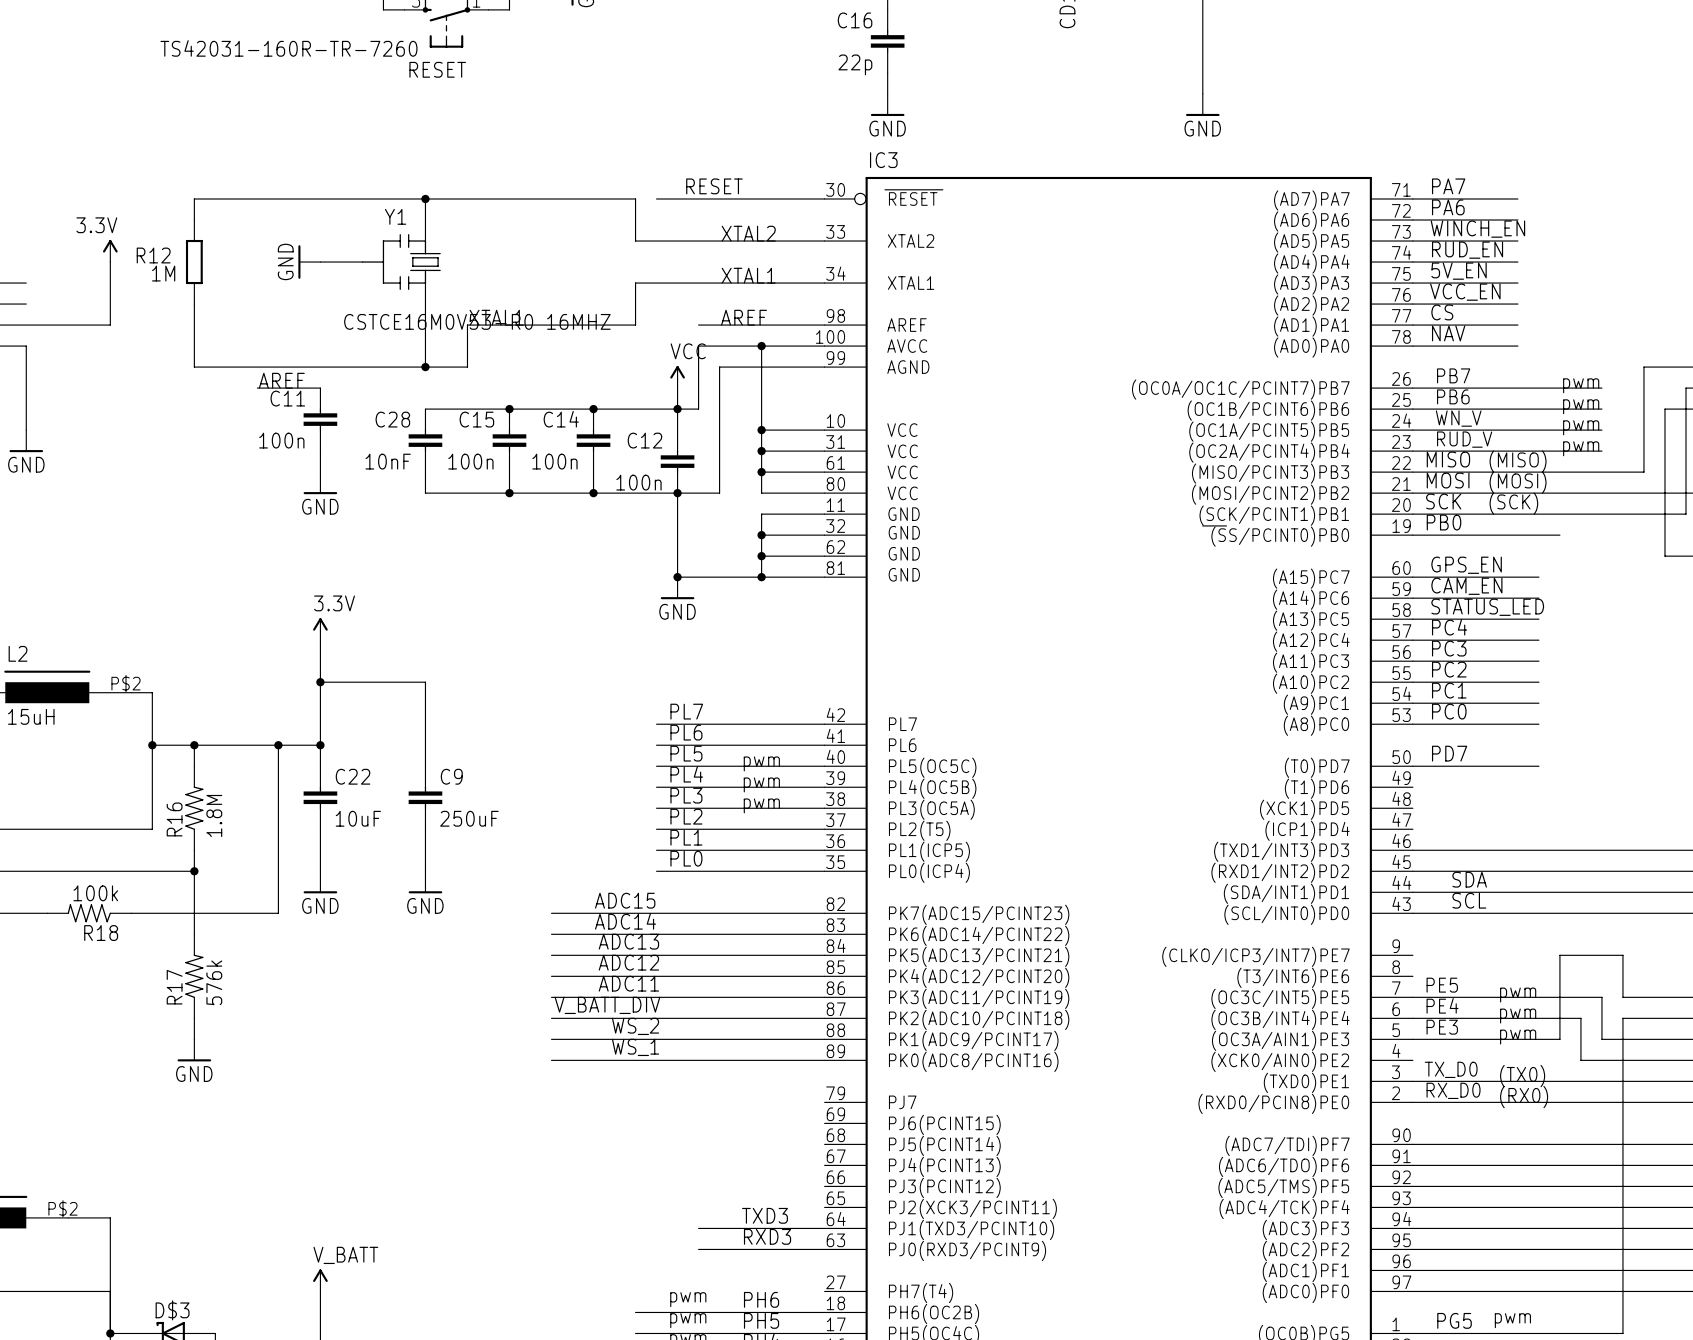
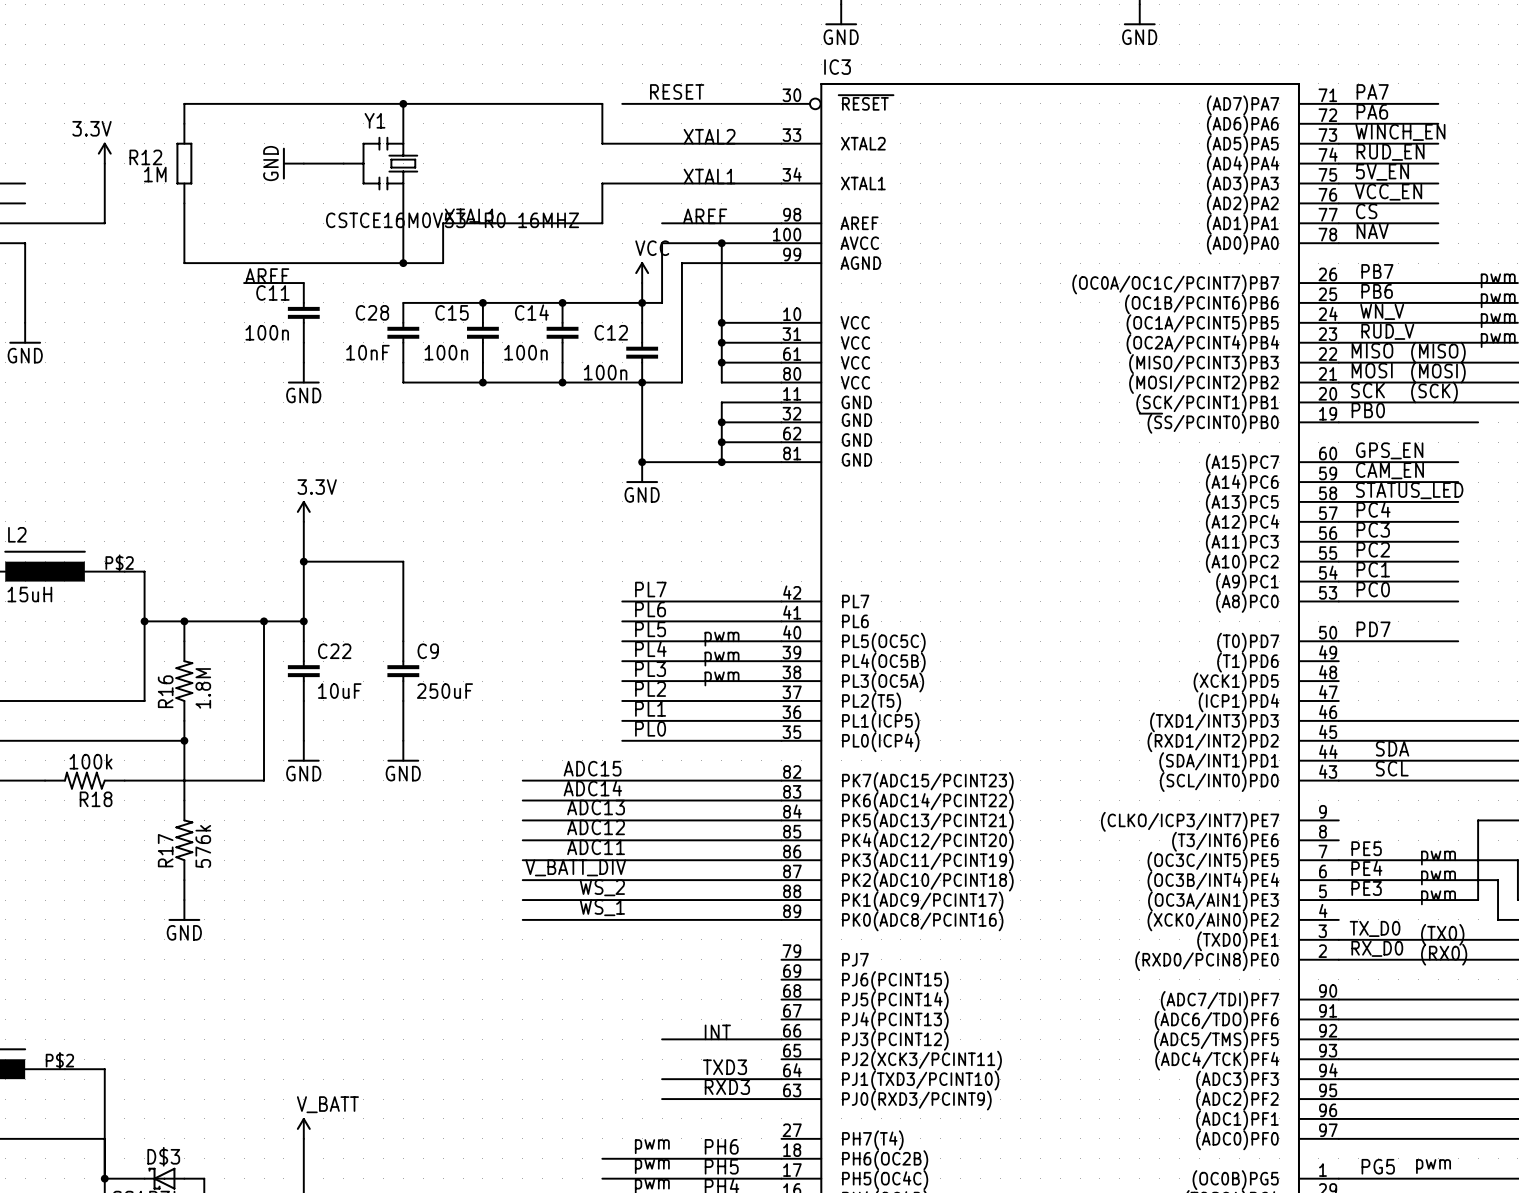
label: none -> INT (717, 1032)
wire: none -> (662, 1039) (781, 1039)

